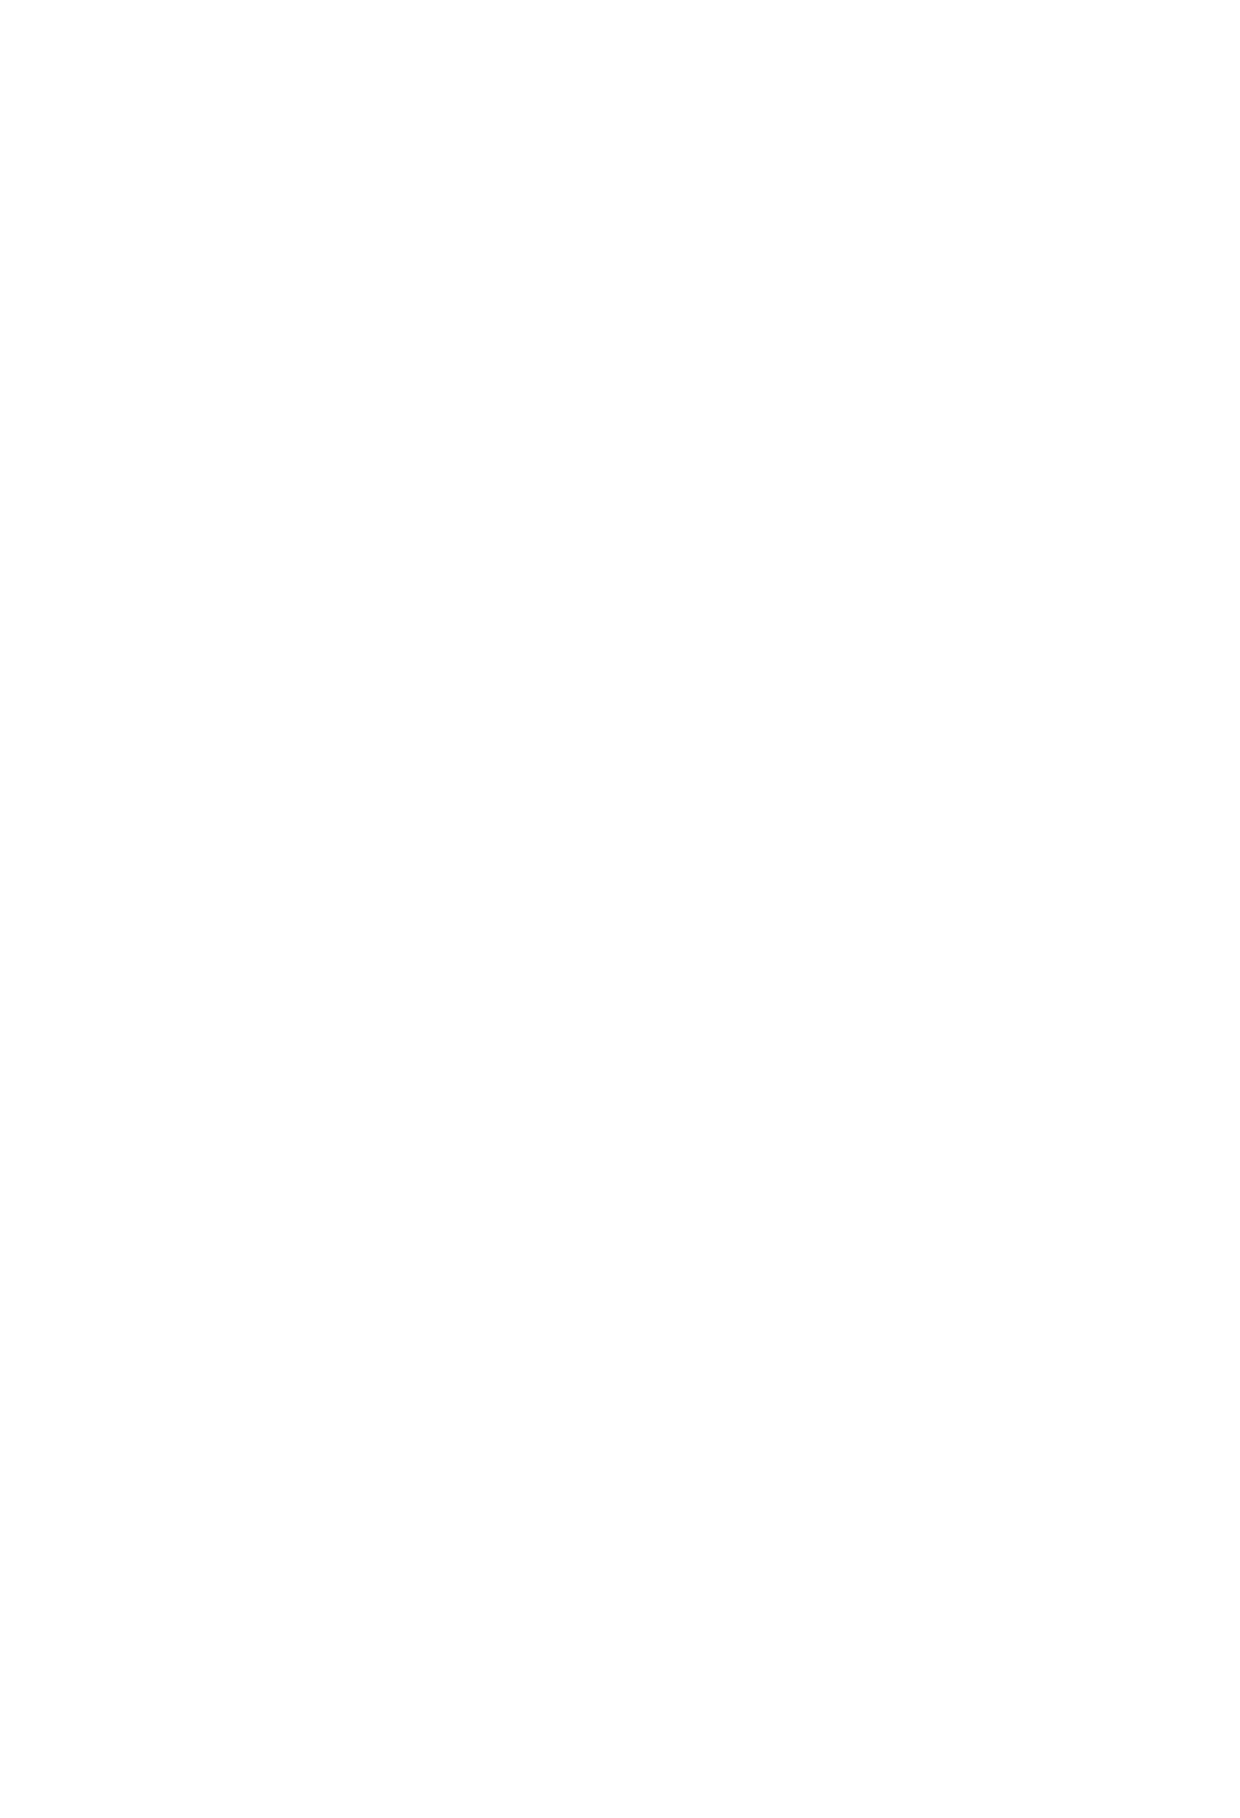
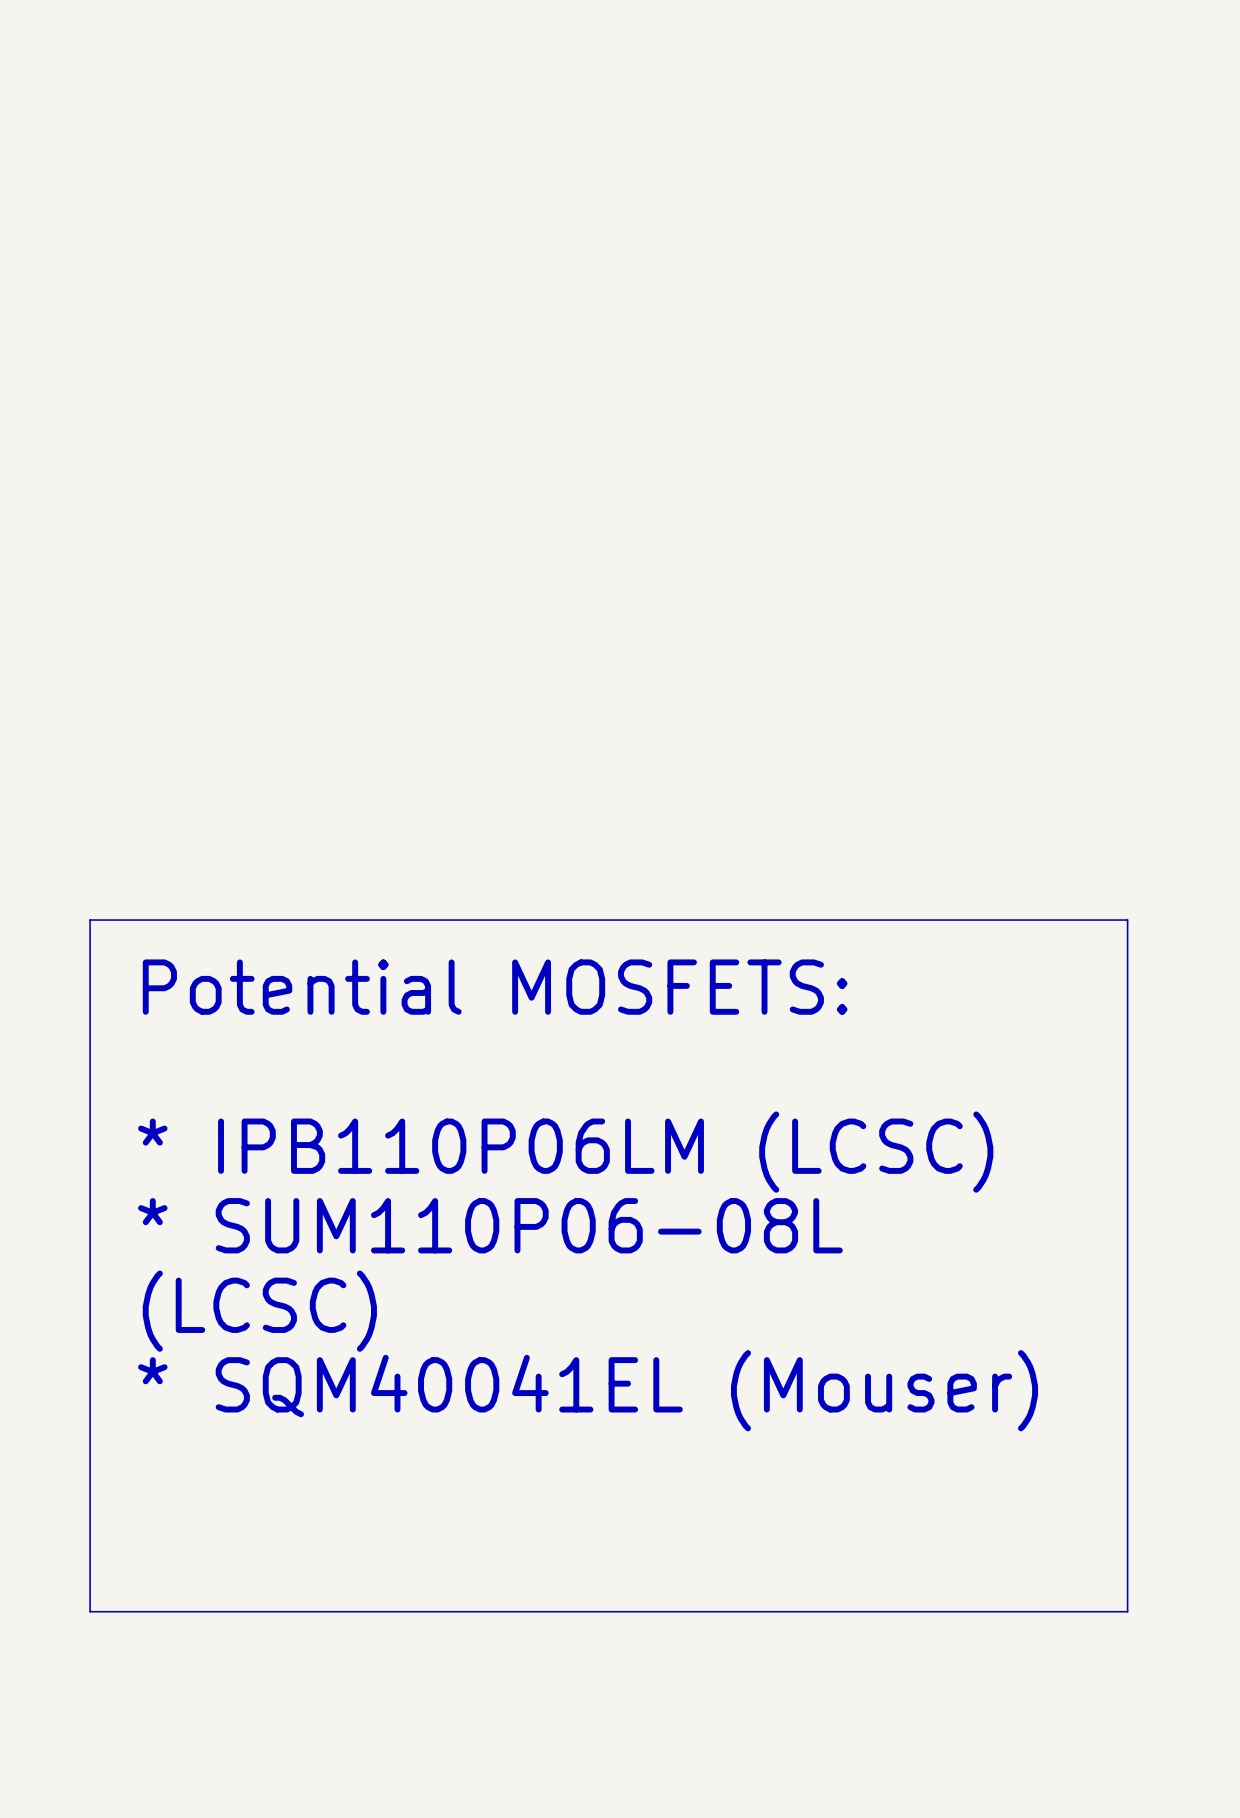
line: none -> (90, 920) (1127, 920) (1127, 1611) (90, 1611) (90, 920)
text: none -> Potential MOSFETS: (495, 987)
text: none -> * IPB110P06LM (LCSC) (565, 1152)
text: none -> * SUM110P06-08L (490, 1225)
text: none -> (LCSC) (259, 1311)
text: none -> * SQM40041EL (Mouser) (588, 1390)

